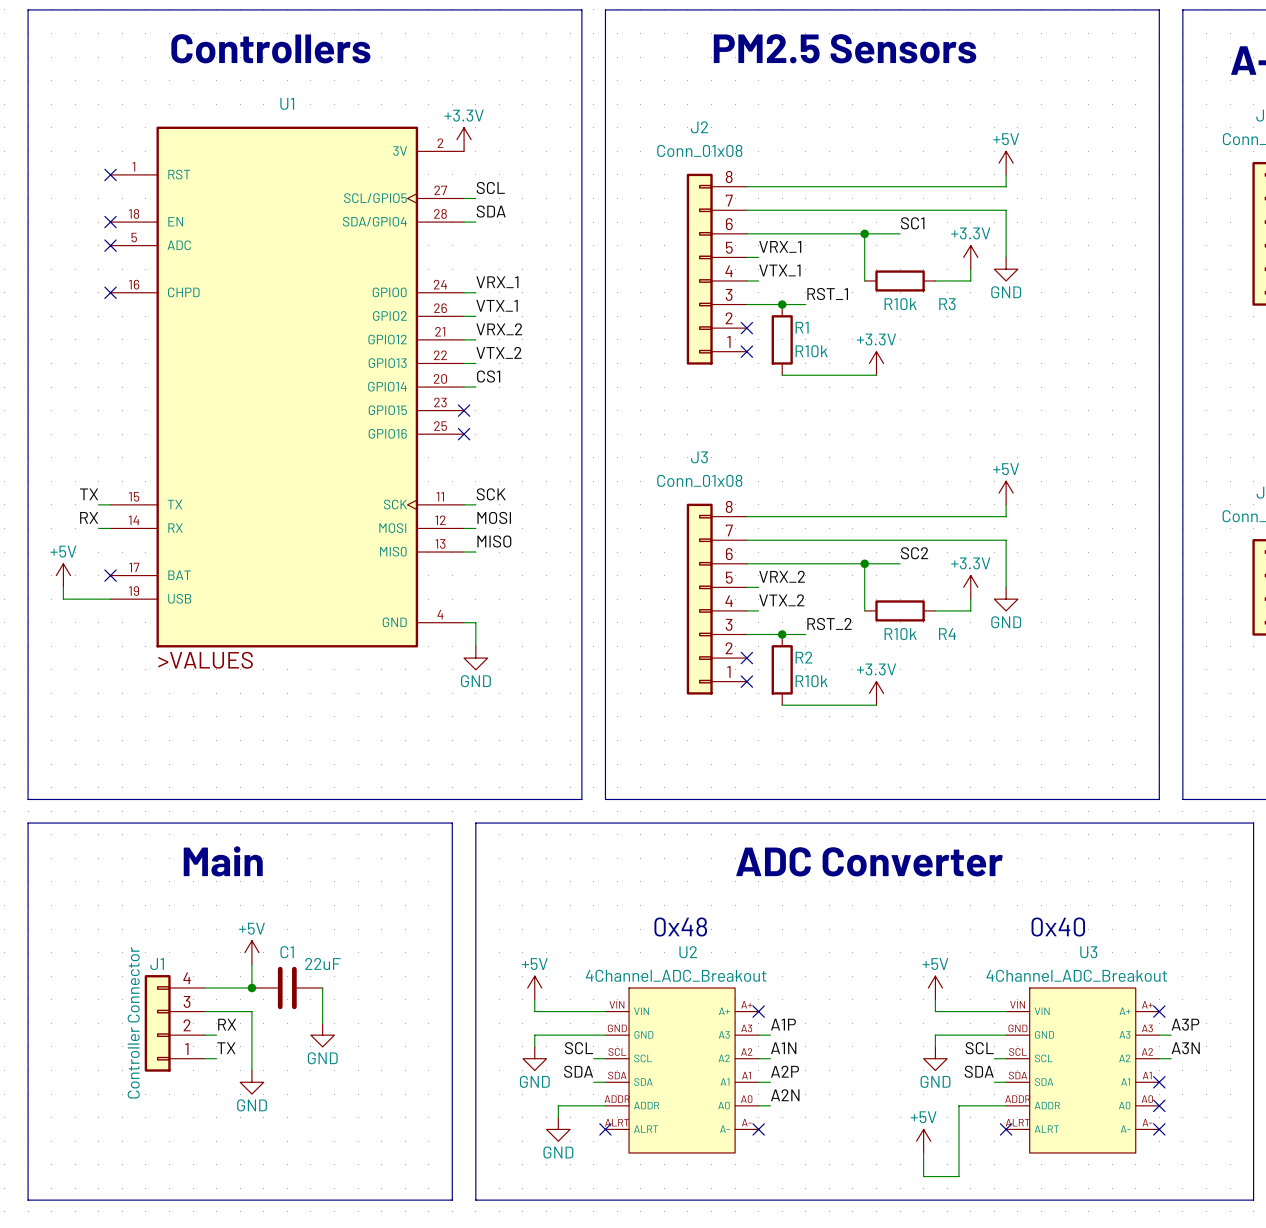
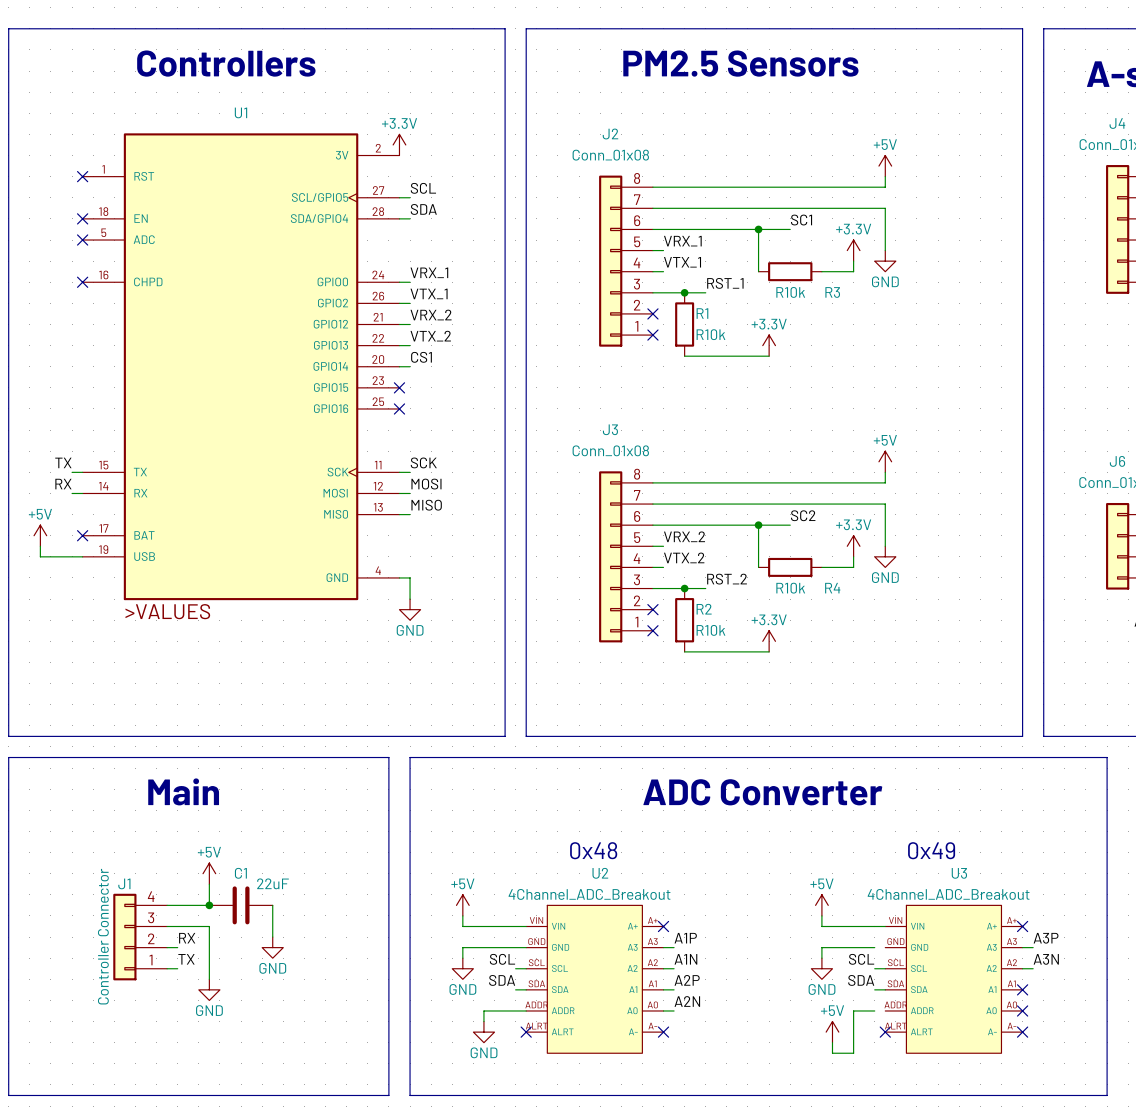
text: 0x40 (1058, 927) -> 0x49 (931, 850)
wire: (994, 1035) (1006, 1035) -> none
wire: (970, 1105) (958, 1105) (958, 1176) (923, 1176) (923, 1152) -> (853, 1010) (853, 1053) (832, 1053) (832, 1042)
wire: (994, 1105) (1006, 1105) -> none
power symbol position: +5V (923, 1141) -> +5V (832, 1032)

